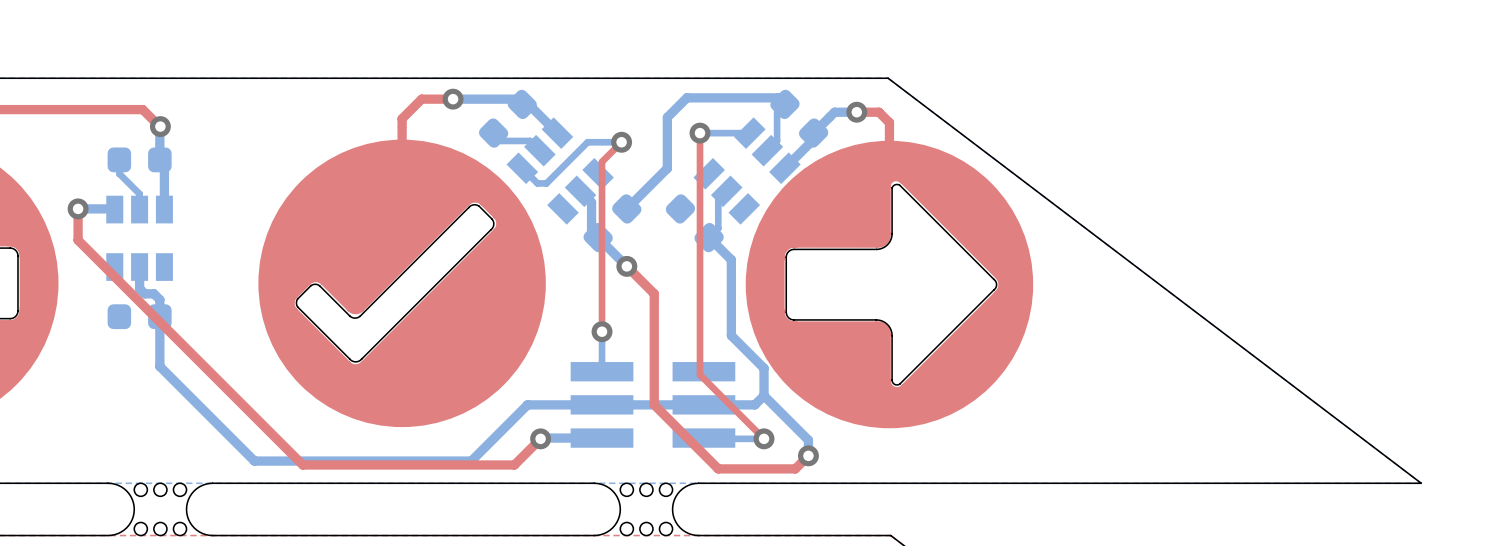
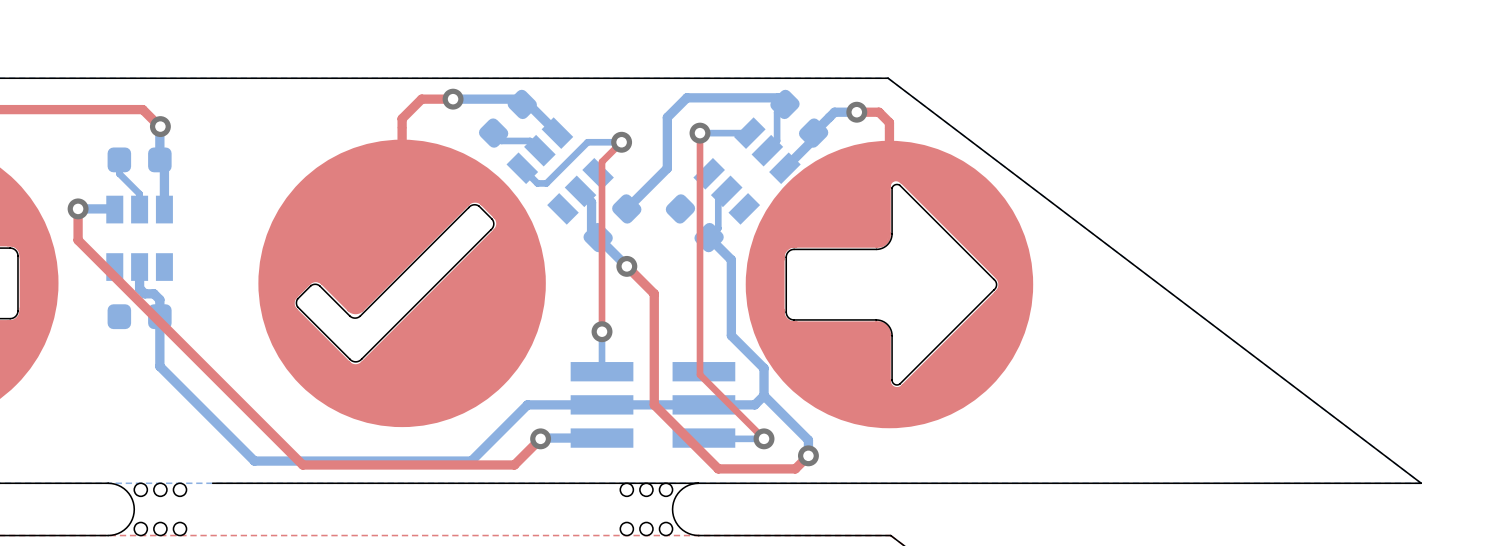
board edge: (212, 483) (202, 485) (194, 490) (188, 499) (186, 509) (188, 519) (194, 527) (202, 533) (212, 535) (597, 535) (607, 532) (614, 525) (619, 516) (620, 505) (616, 496) (610, 488) (594, 483) -> (698, 483) (594, 483)

